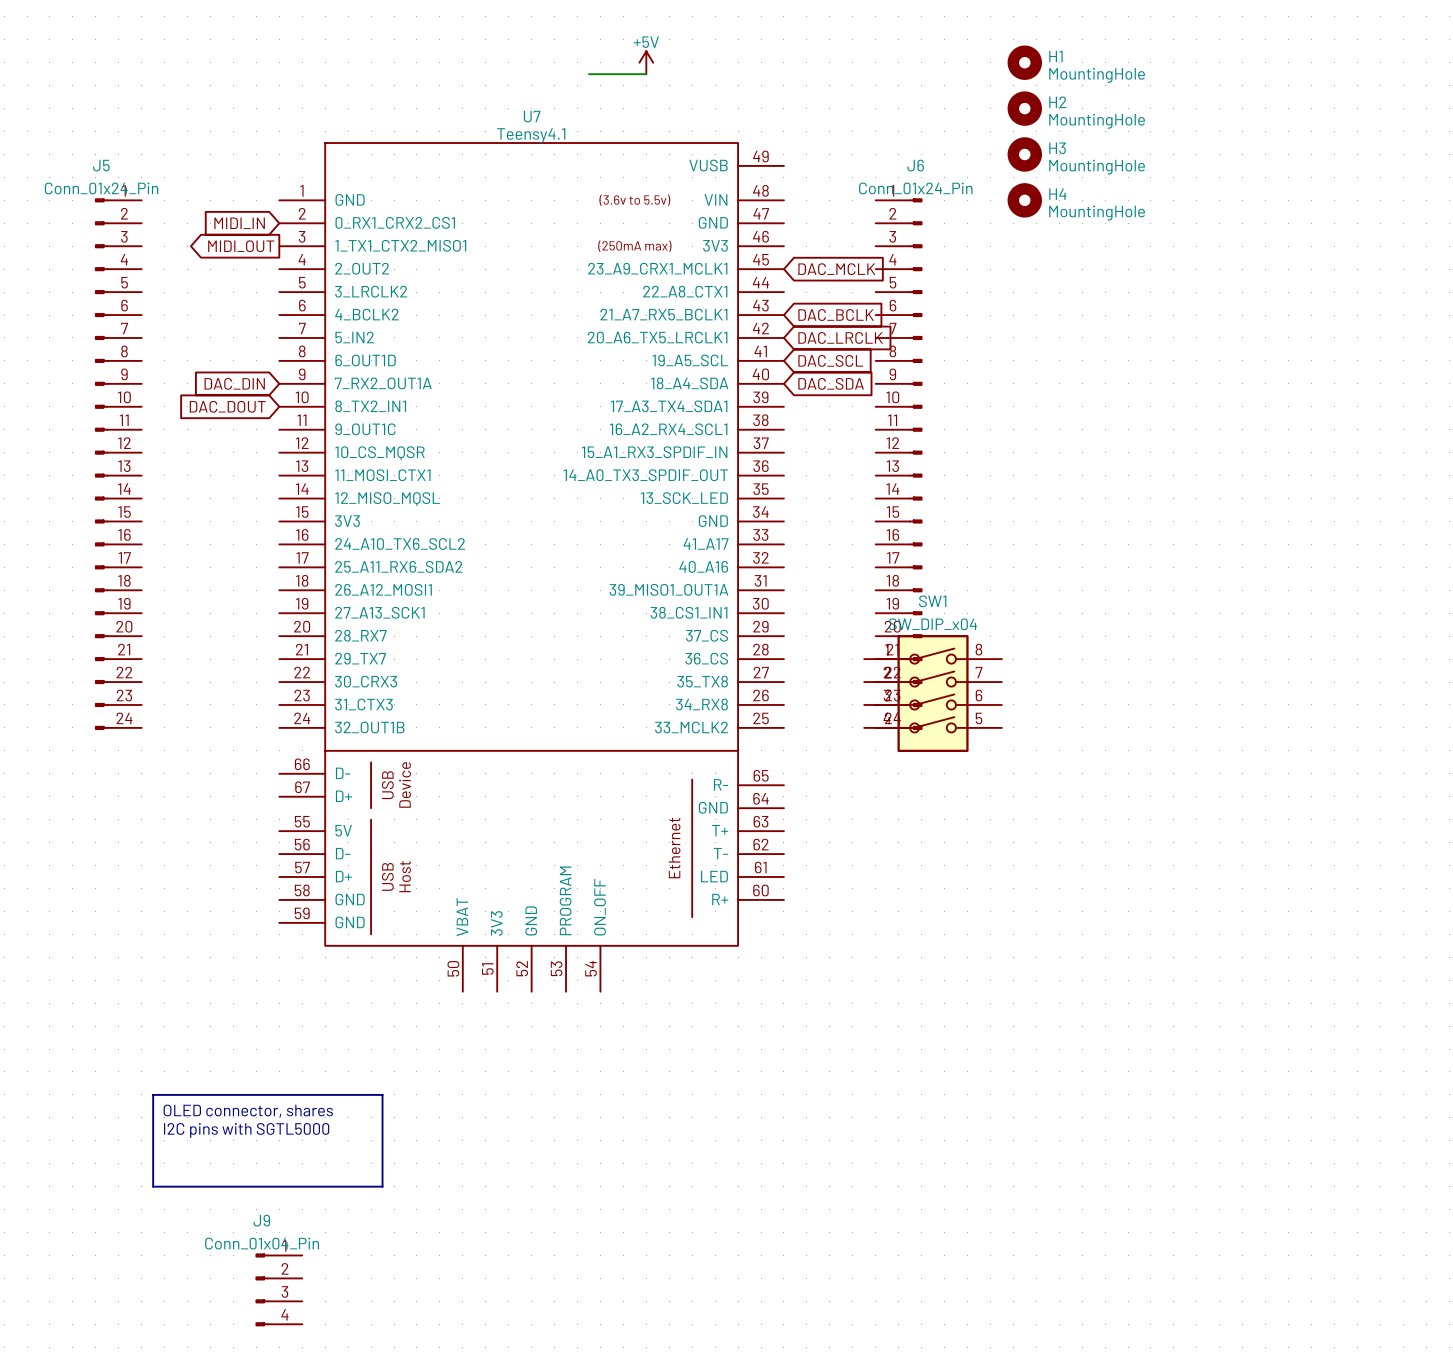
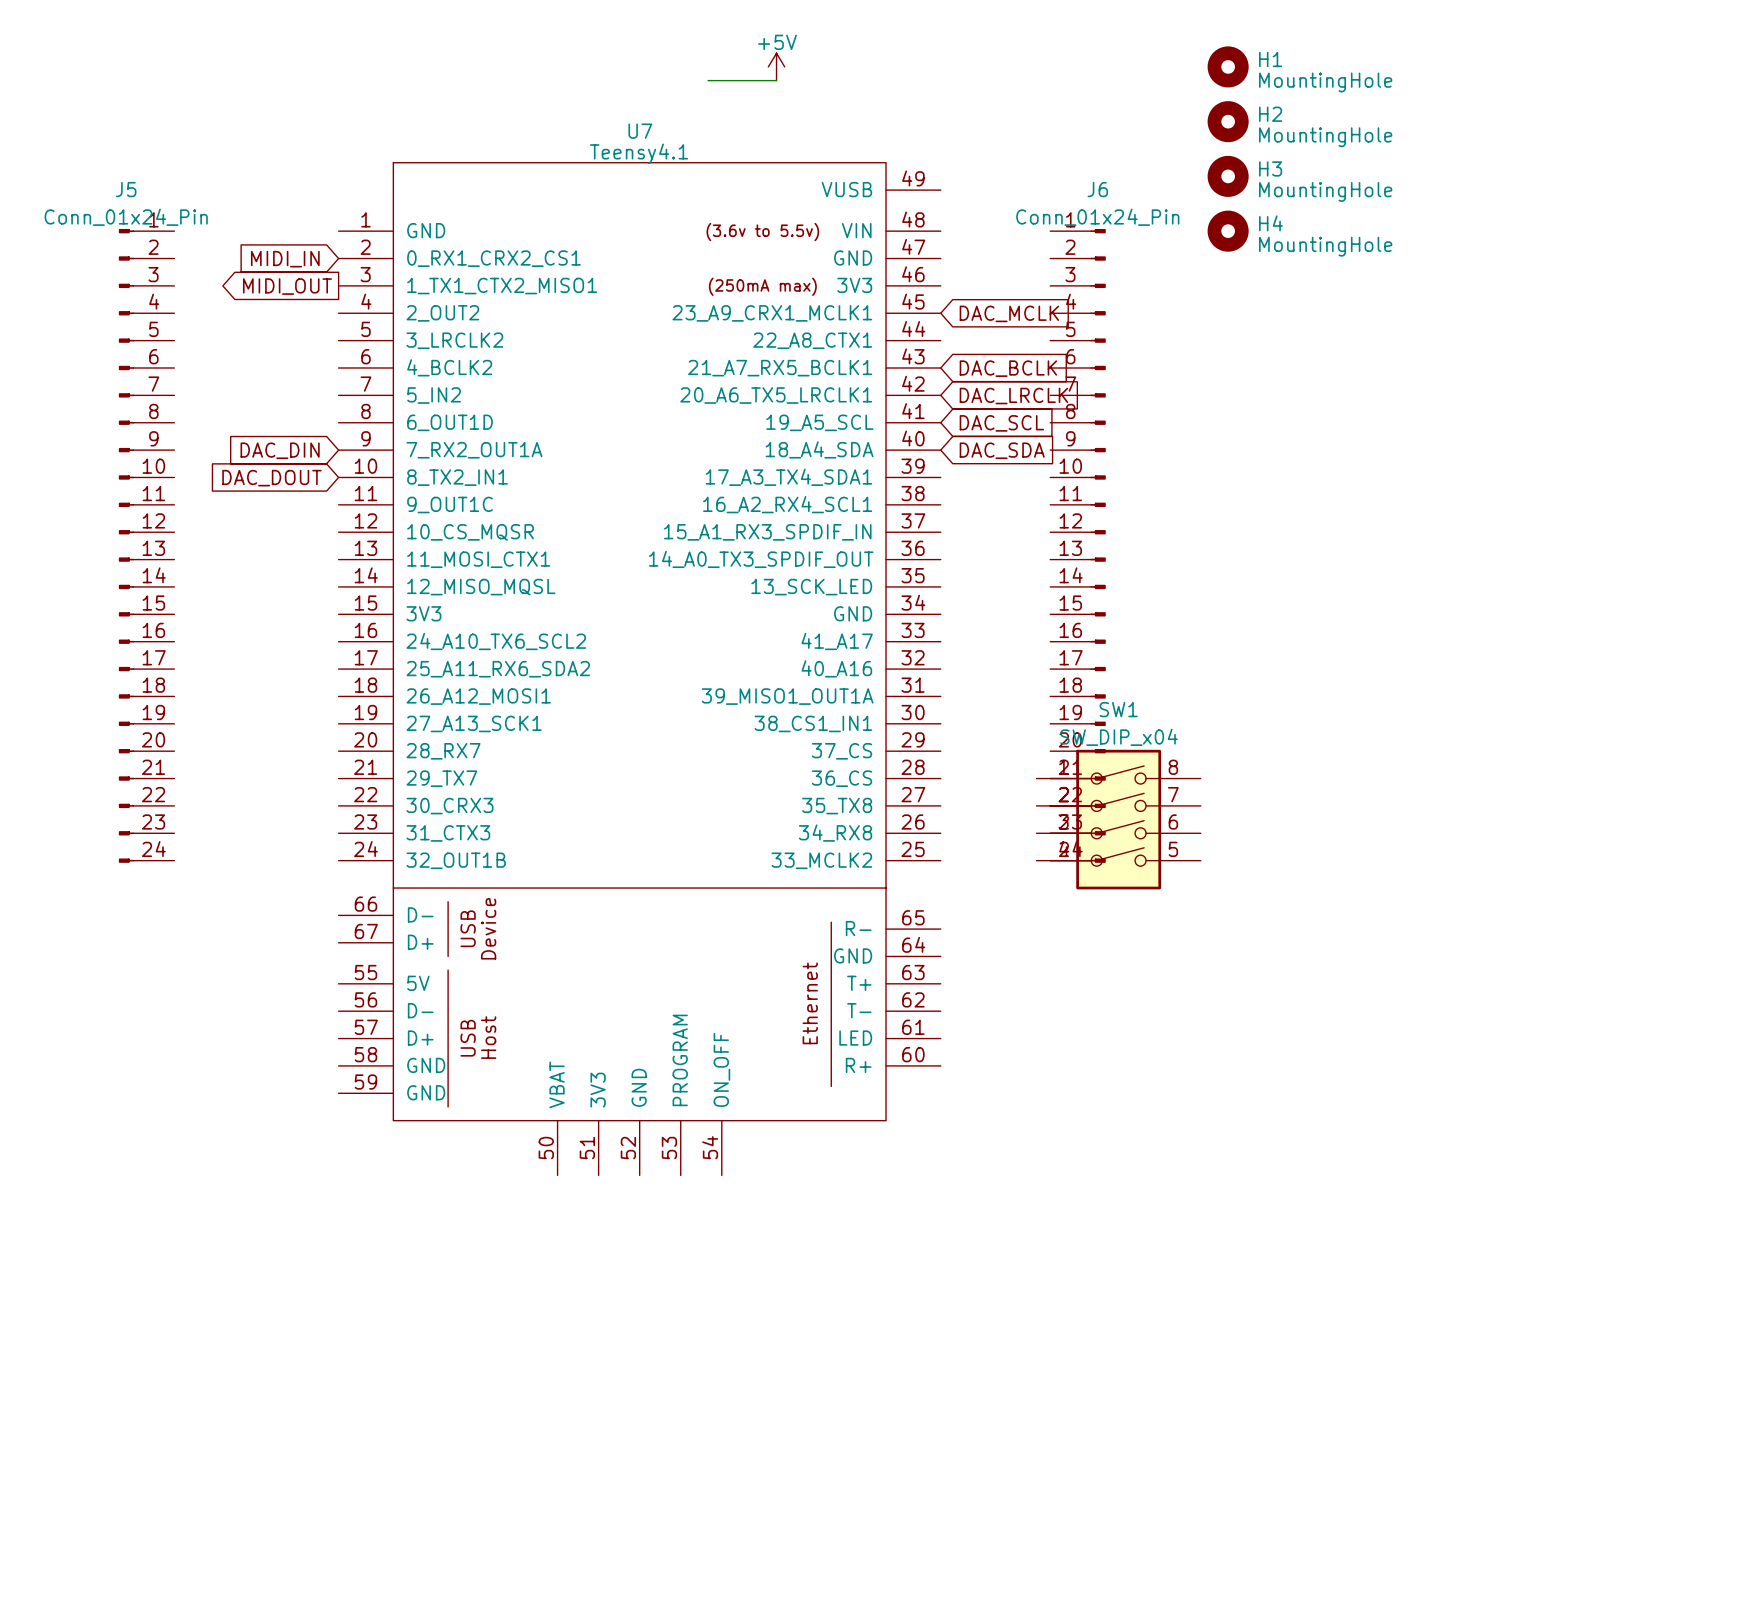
line: (153, 1094) (382, 1094) (382, 1186) (153, 1186) (153, 1094) -> none
text: OLED connector, shares (248, 1111) -> none
text: I2C pins with SGTL5000 (246, 1130) -> none
J9: Conn_01x04_Pin (278, 1289) -> none

